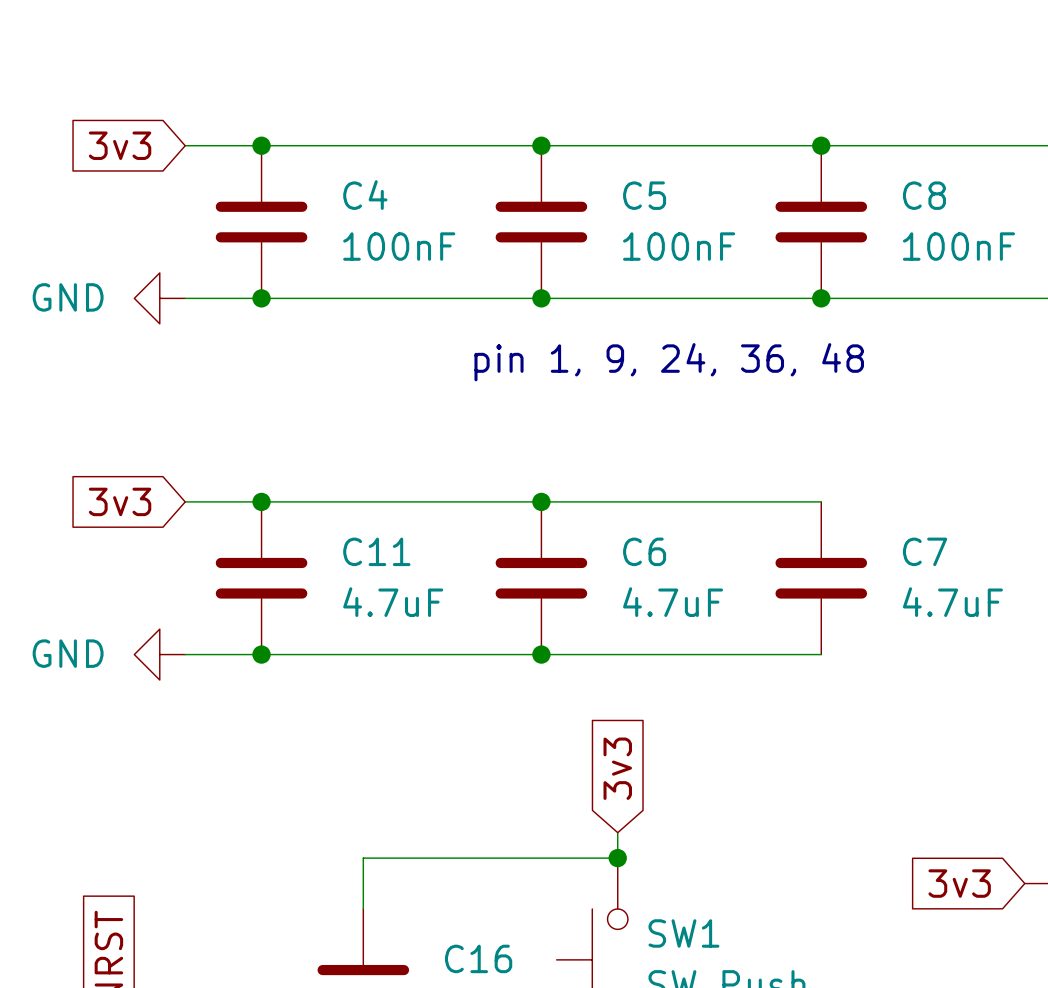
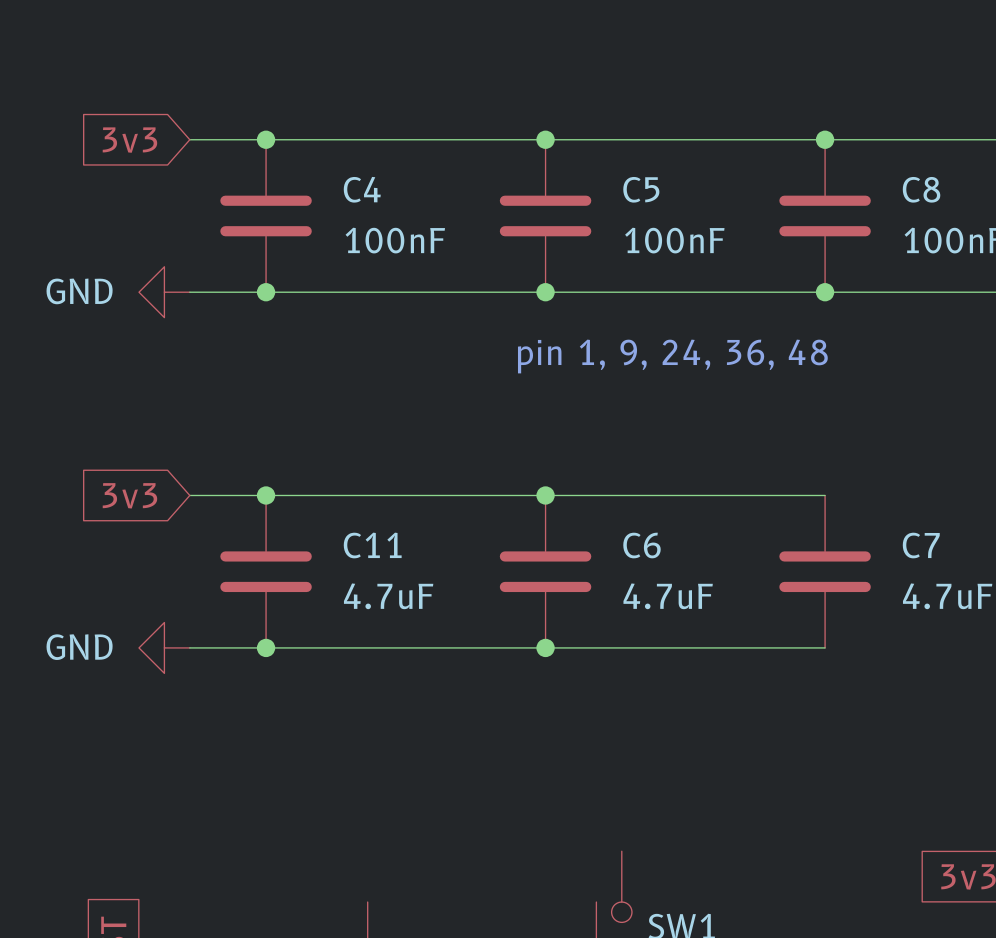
global label: 3v3 (617, 768) -> none
wire: (617, 832) (617, 858) (363, 858) (363, 908) -> none
junction: (617, 858) -> none

